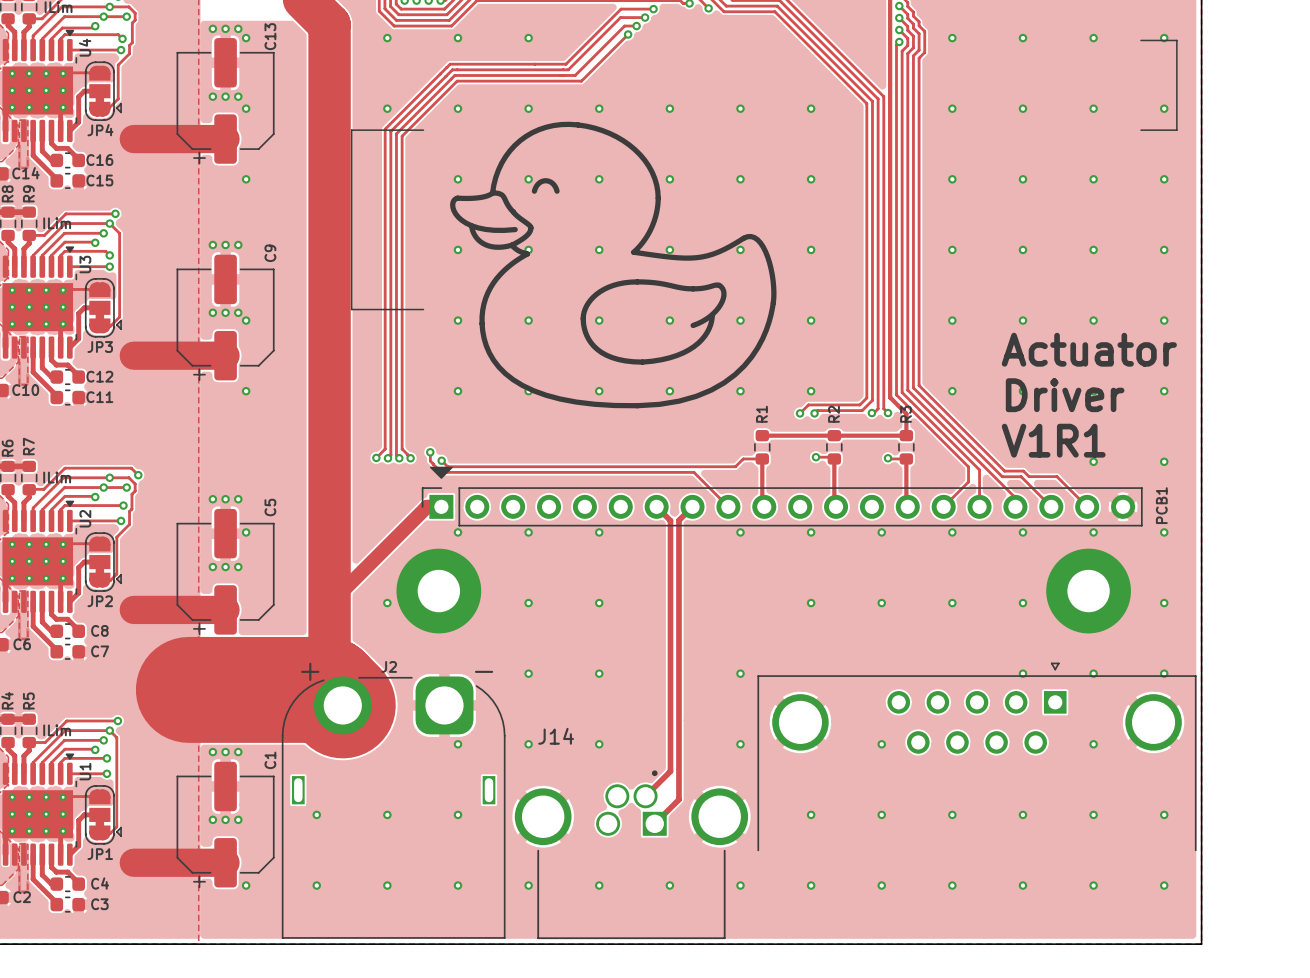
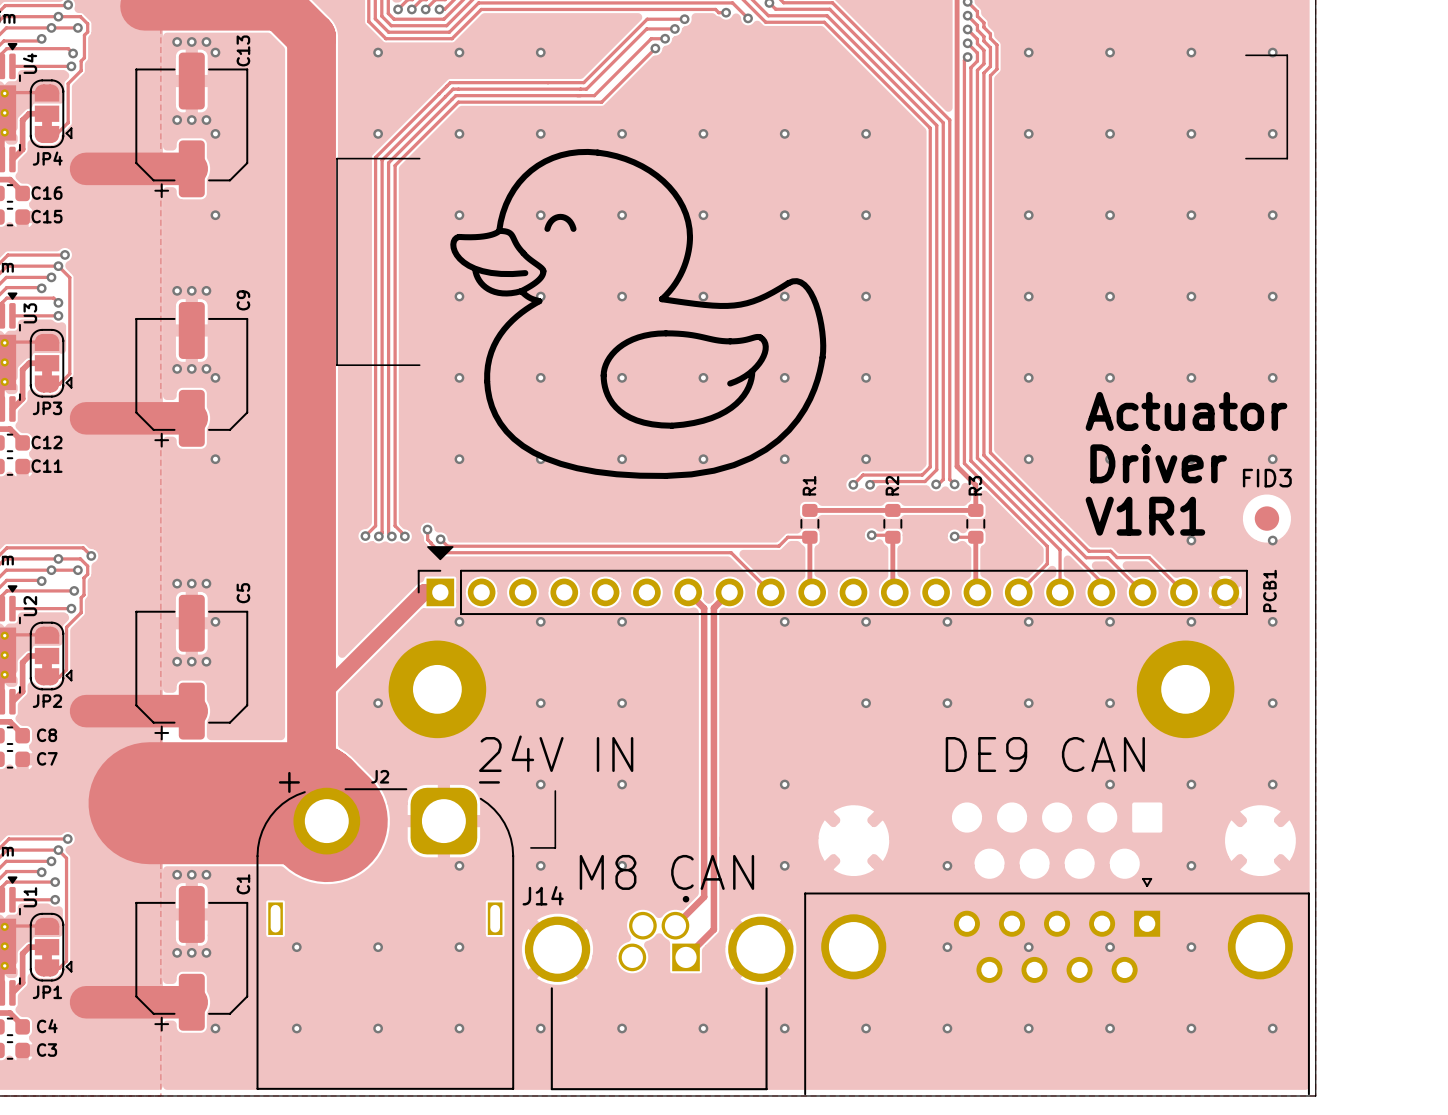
FID3: none -> (1266, 518)
text: none -> 24V IN (556, 753)
text: none -> DE9 CAN (1045, 754)
line: none -> (555, 791) (555, 847) (530, 847)
J14 name position: J14 (556, 736) -> J14 (543, 895)
text: none -> M8 CAN (666, 872)
part position: (977, 756) -> (1057, 986)

